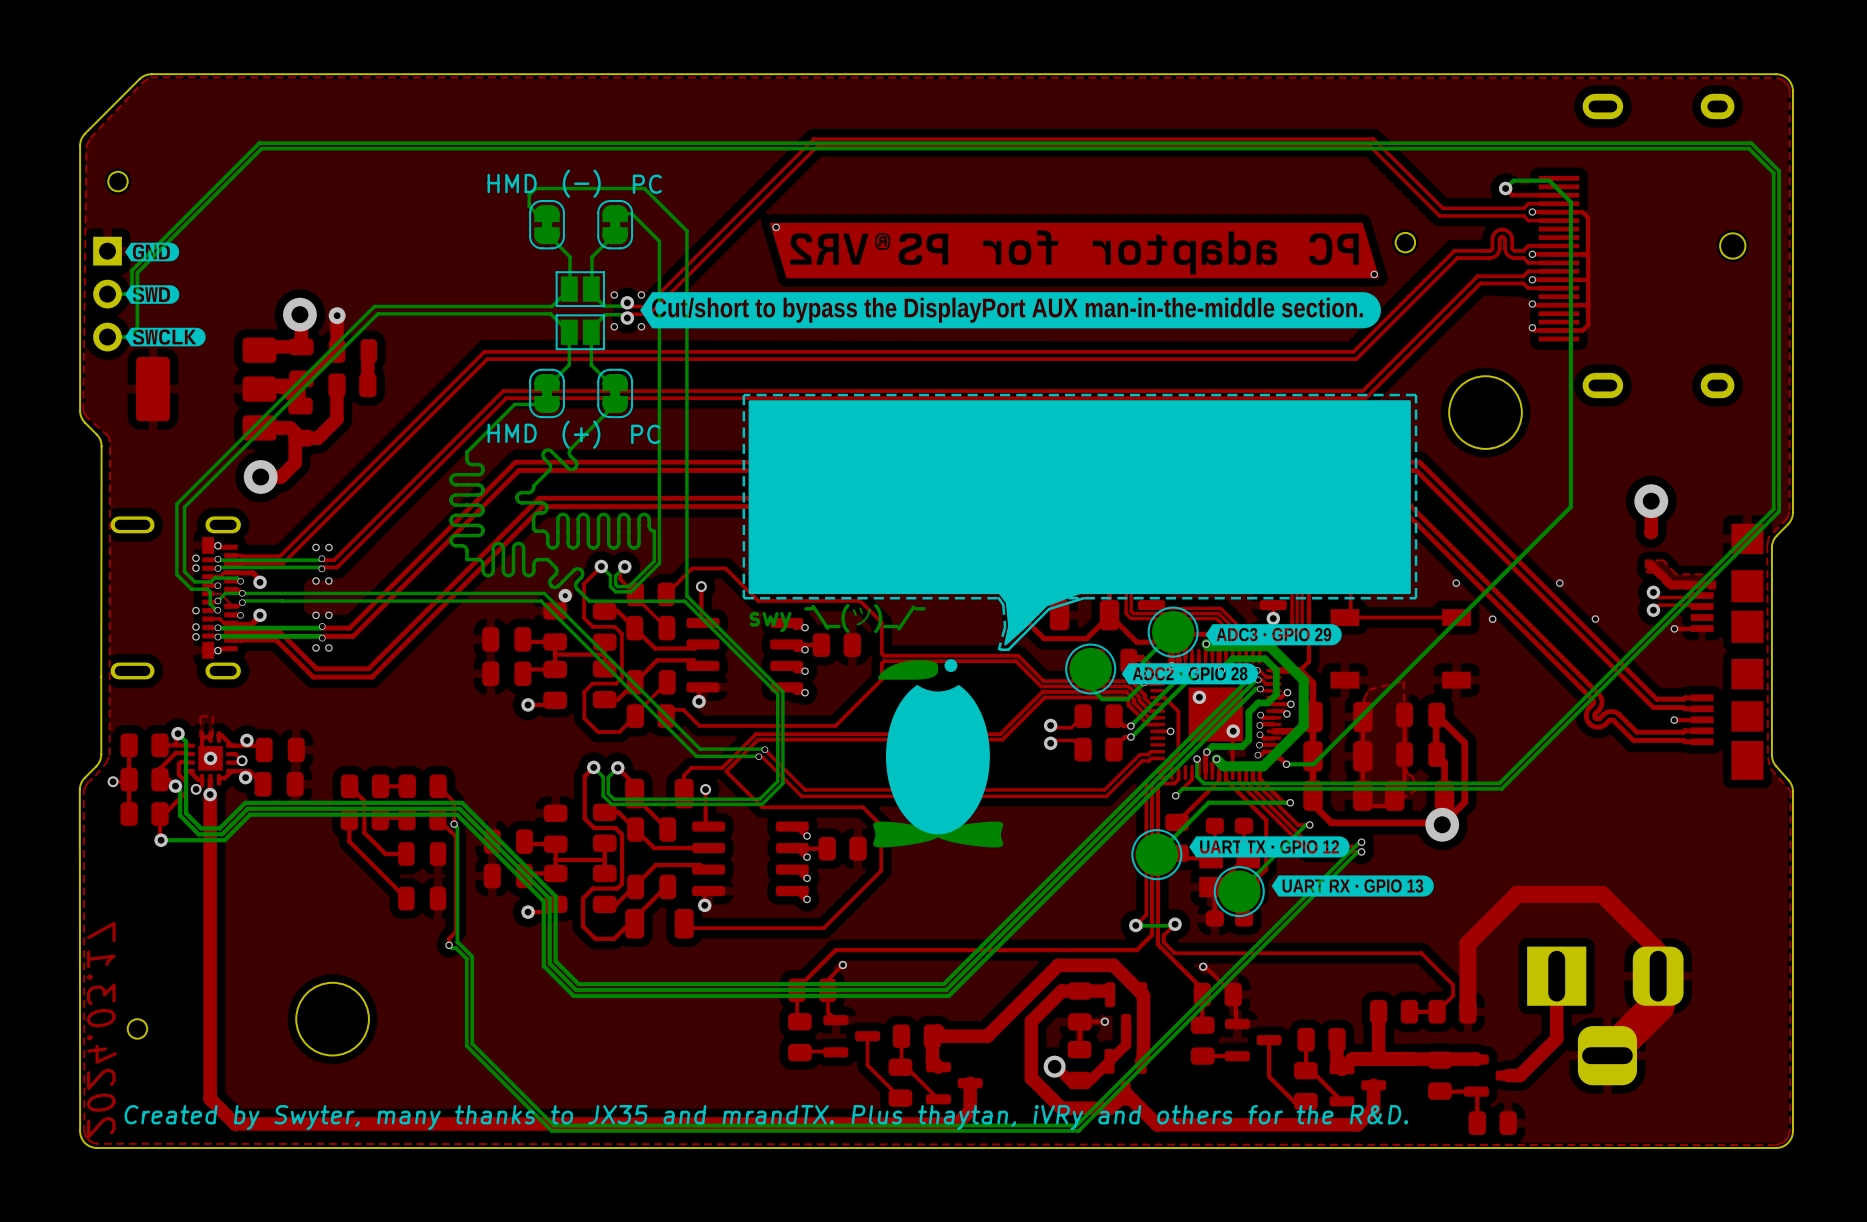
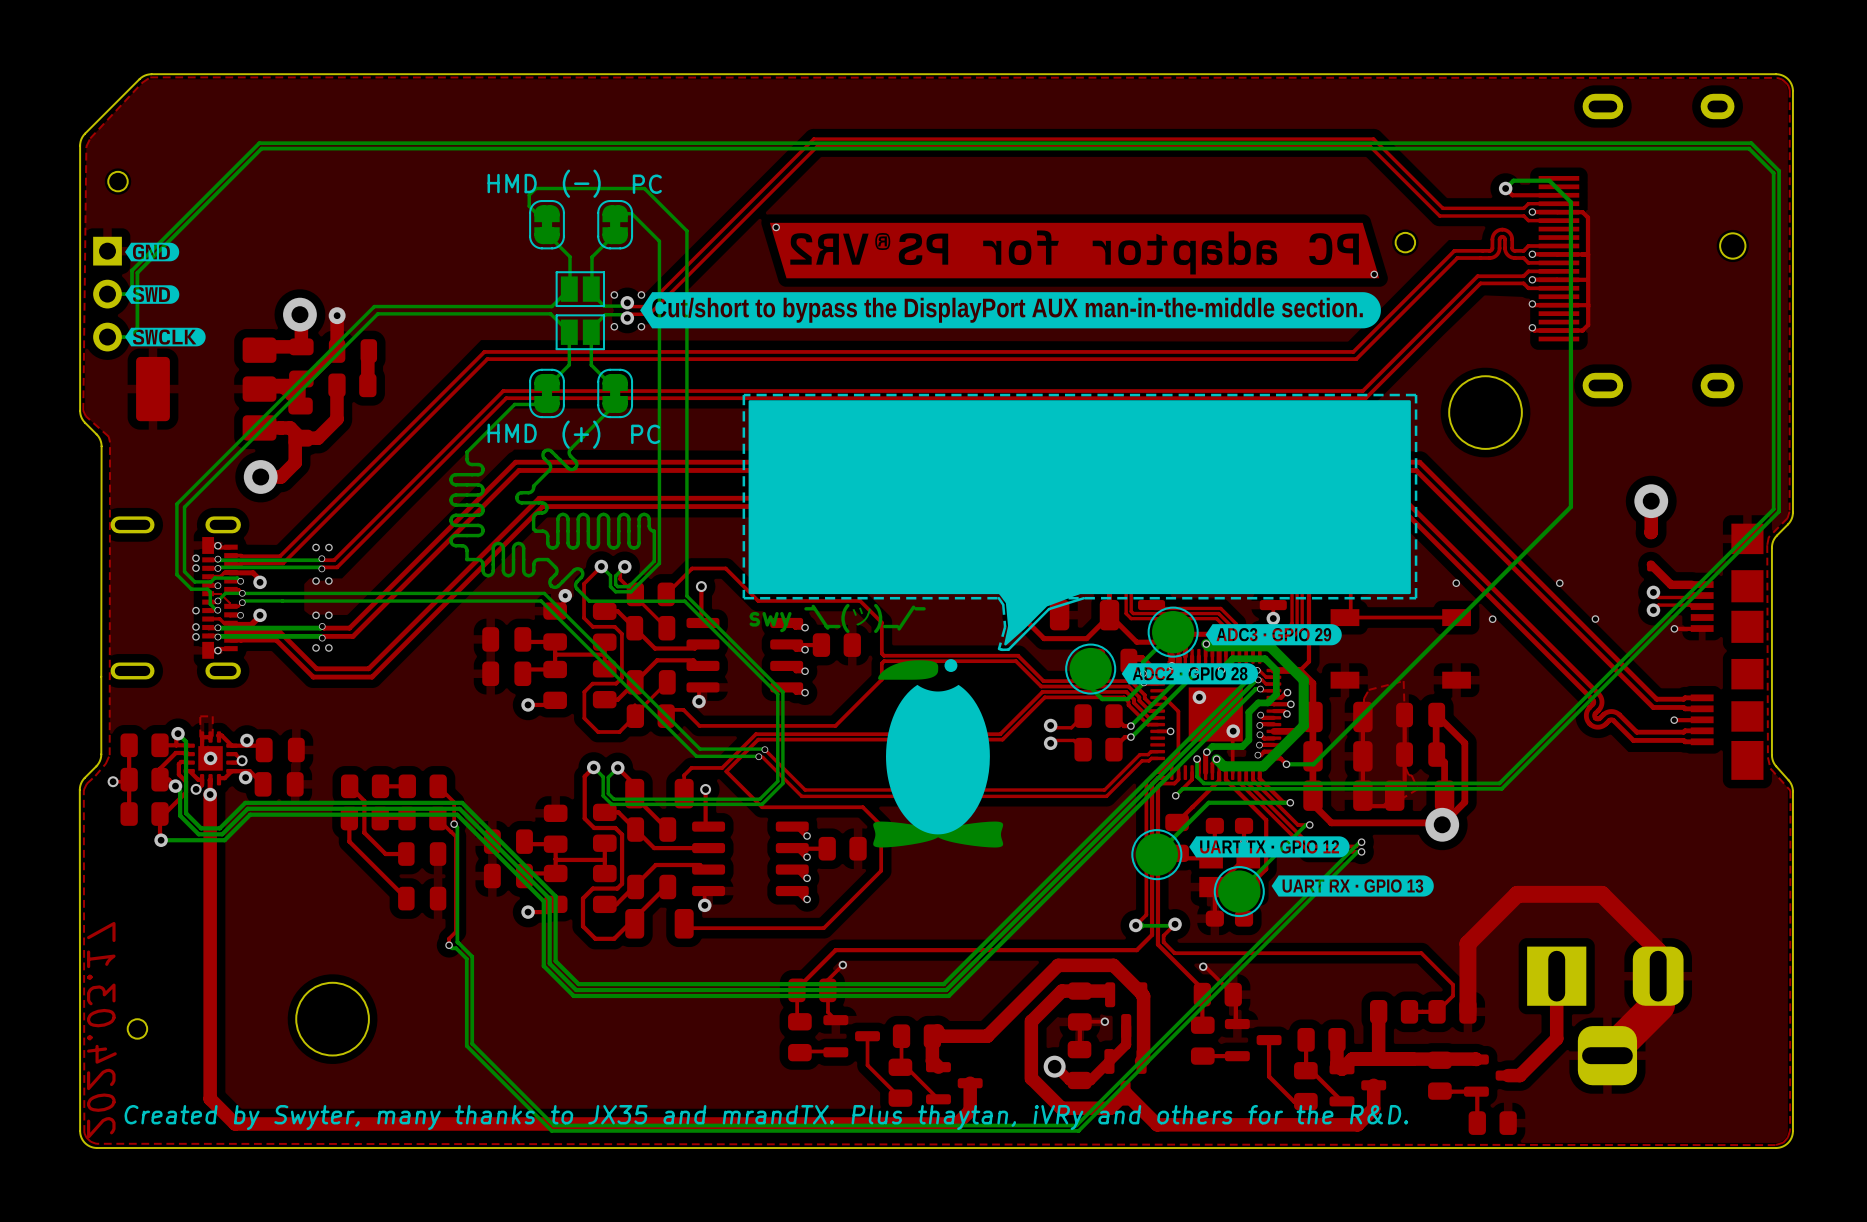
top zone outline: (1663, 560) (1675, 574) (1715, 574) (1715, 588) (1668, 587) (1653, 572) (1645, 571) (1645, 560) (1663, 560) -> none

